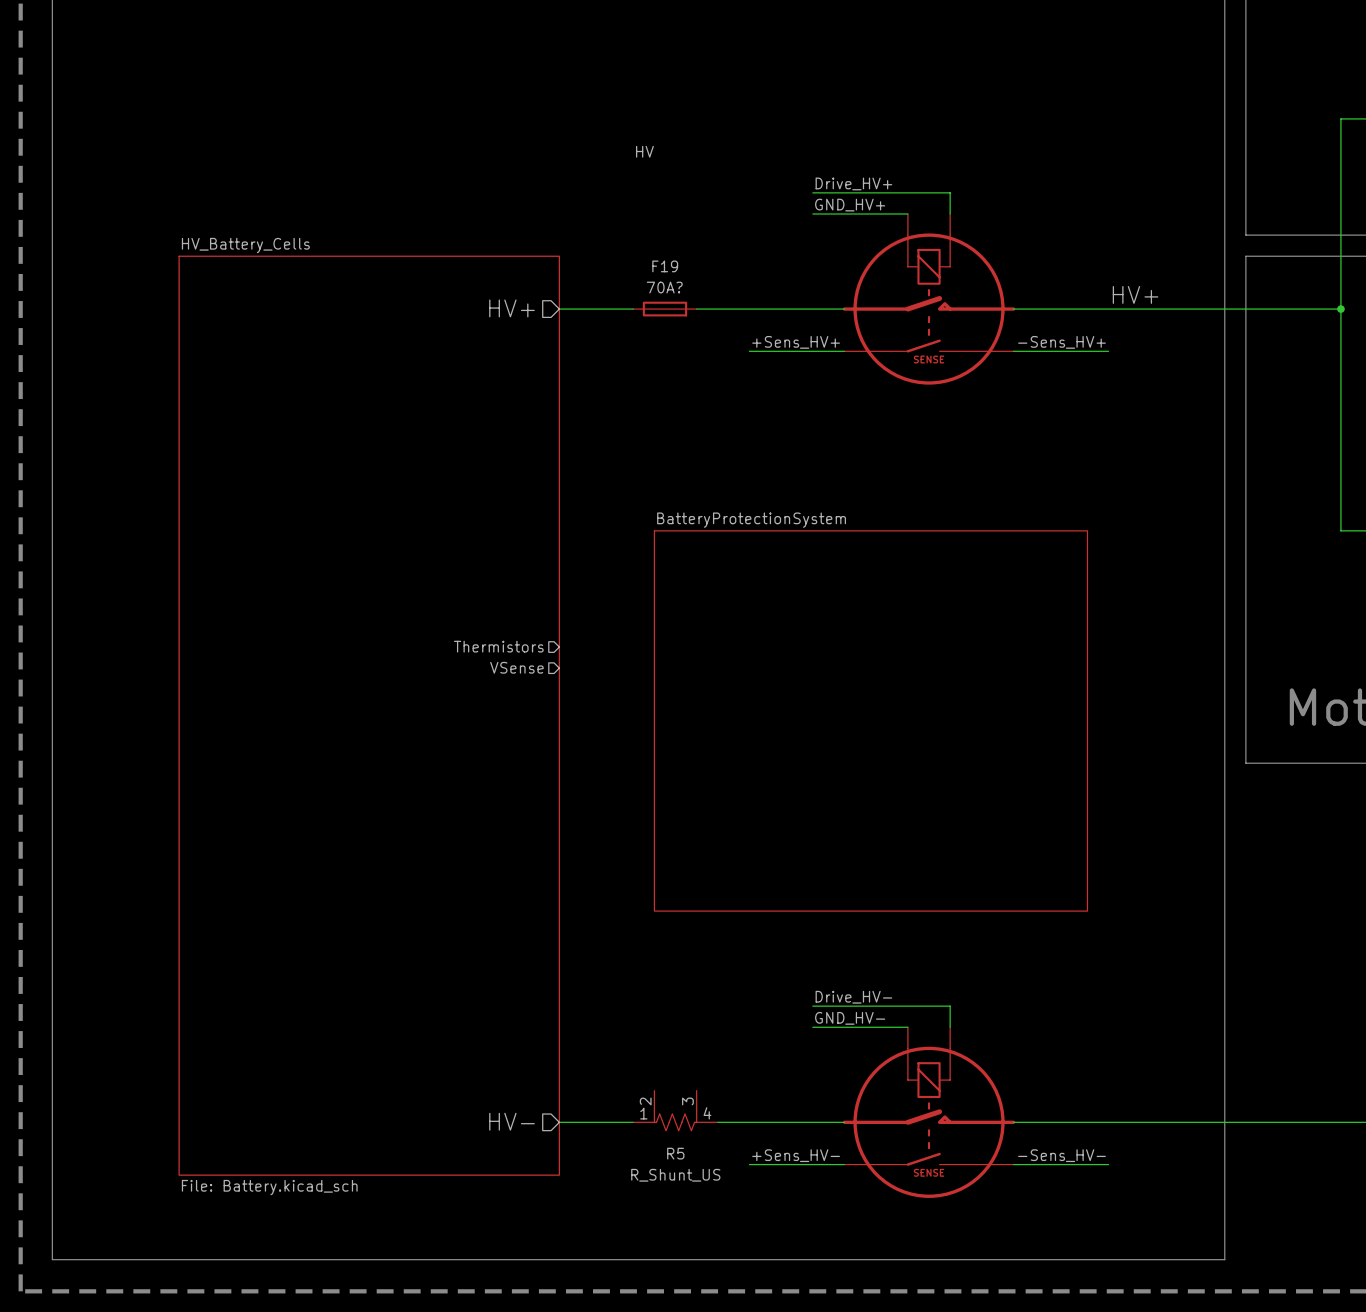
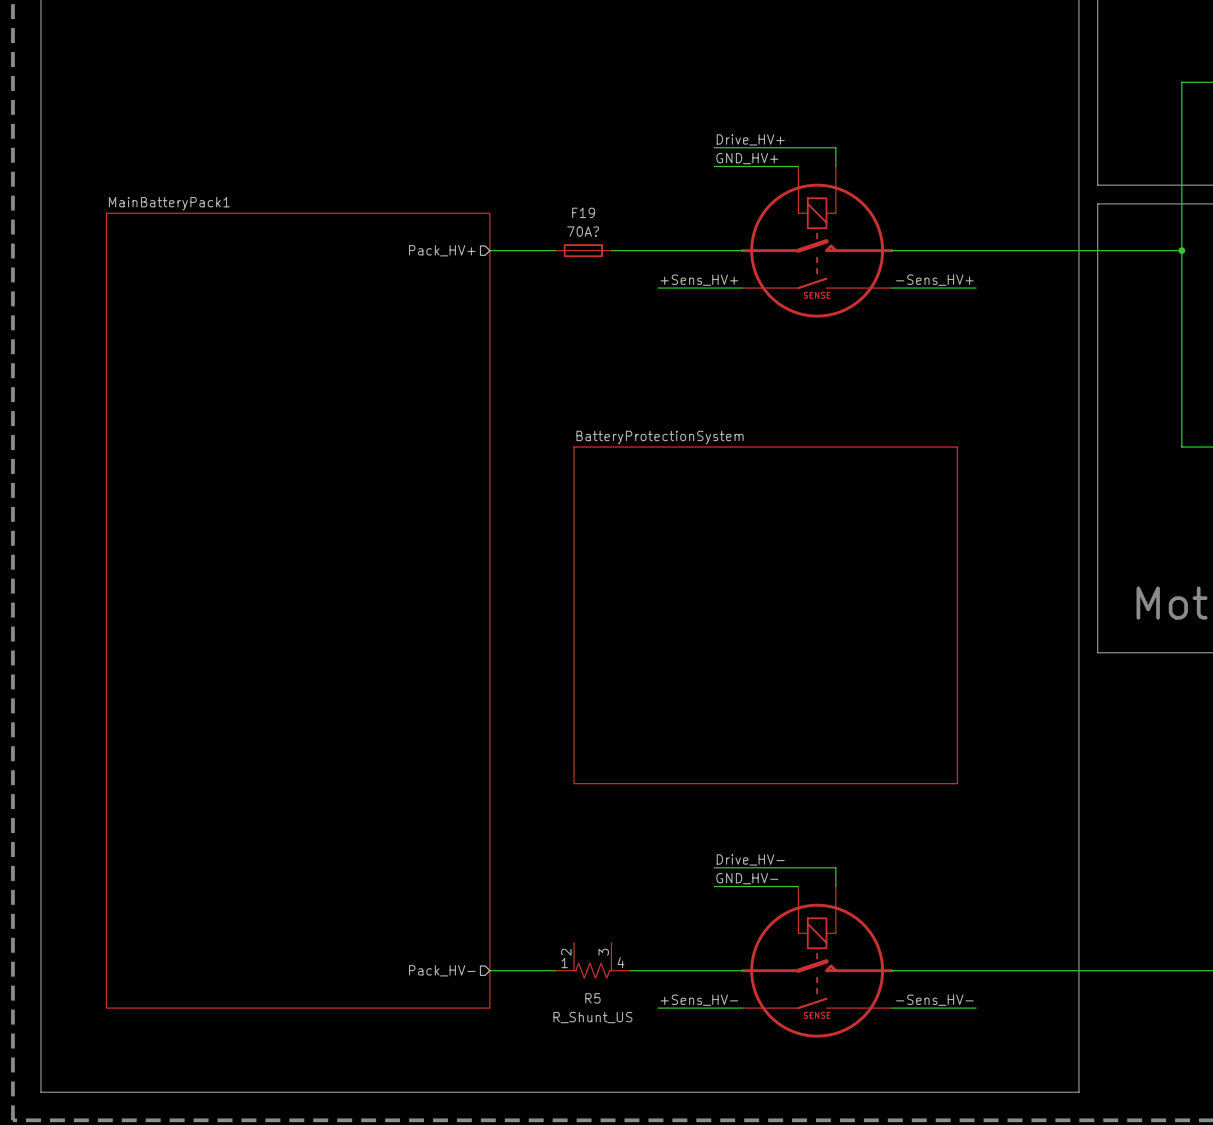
label: HV (644, 151) -> none
label: HV+ (1135, 294) -> none
sheet pin: HV+ (511, 308) -> Pack_HV+ (442, 250)
sheet pin: Thermistors (498, 646) -> none
sheet pin: VSense (516, 667) -> none
sheet MainBatteryPack1: none -> (298, 610)
sheet HV_Battery_Cells: File: Battery.kicad_sch (369, 715) -> none
sheet pin: HV- (511, 1121) -> Pack_HV- (442, 970)

